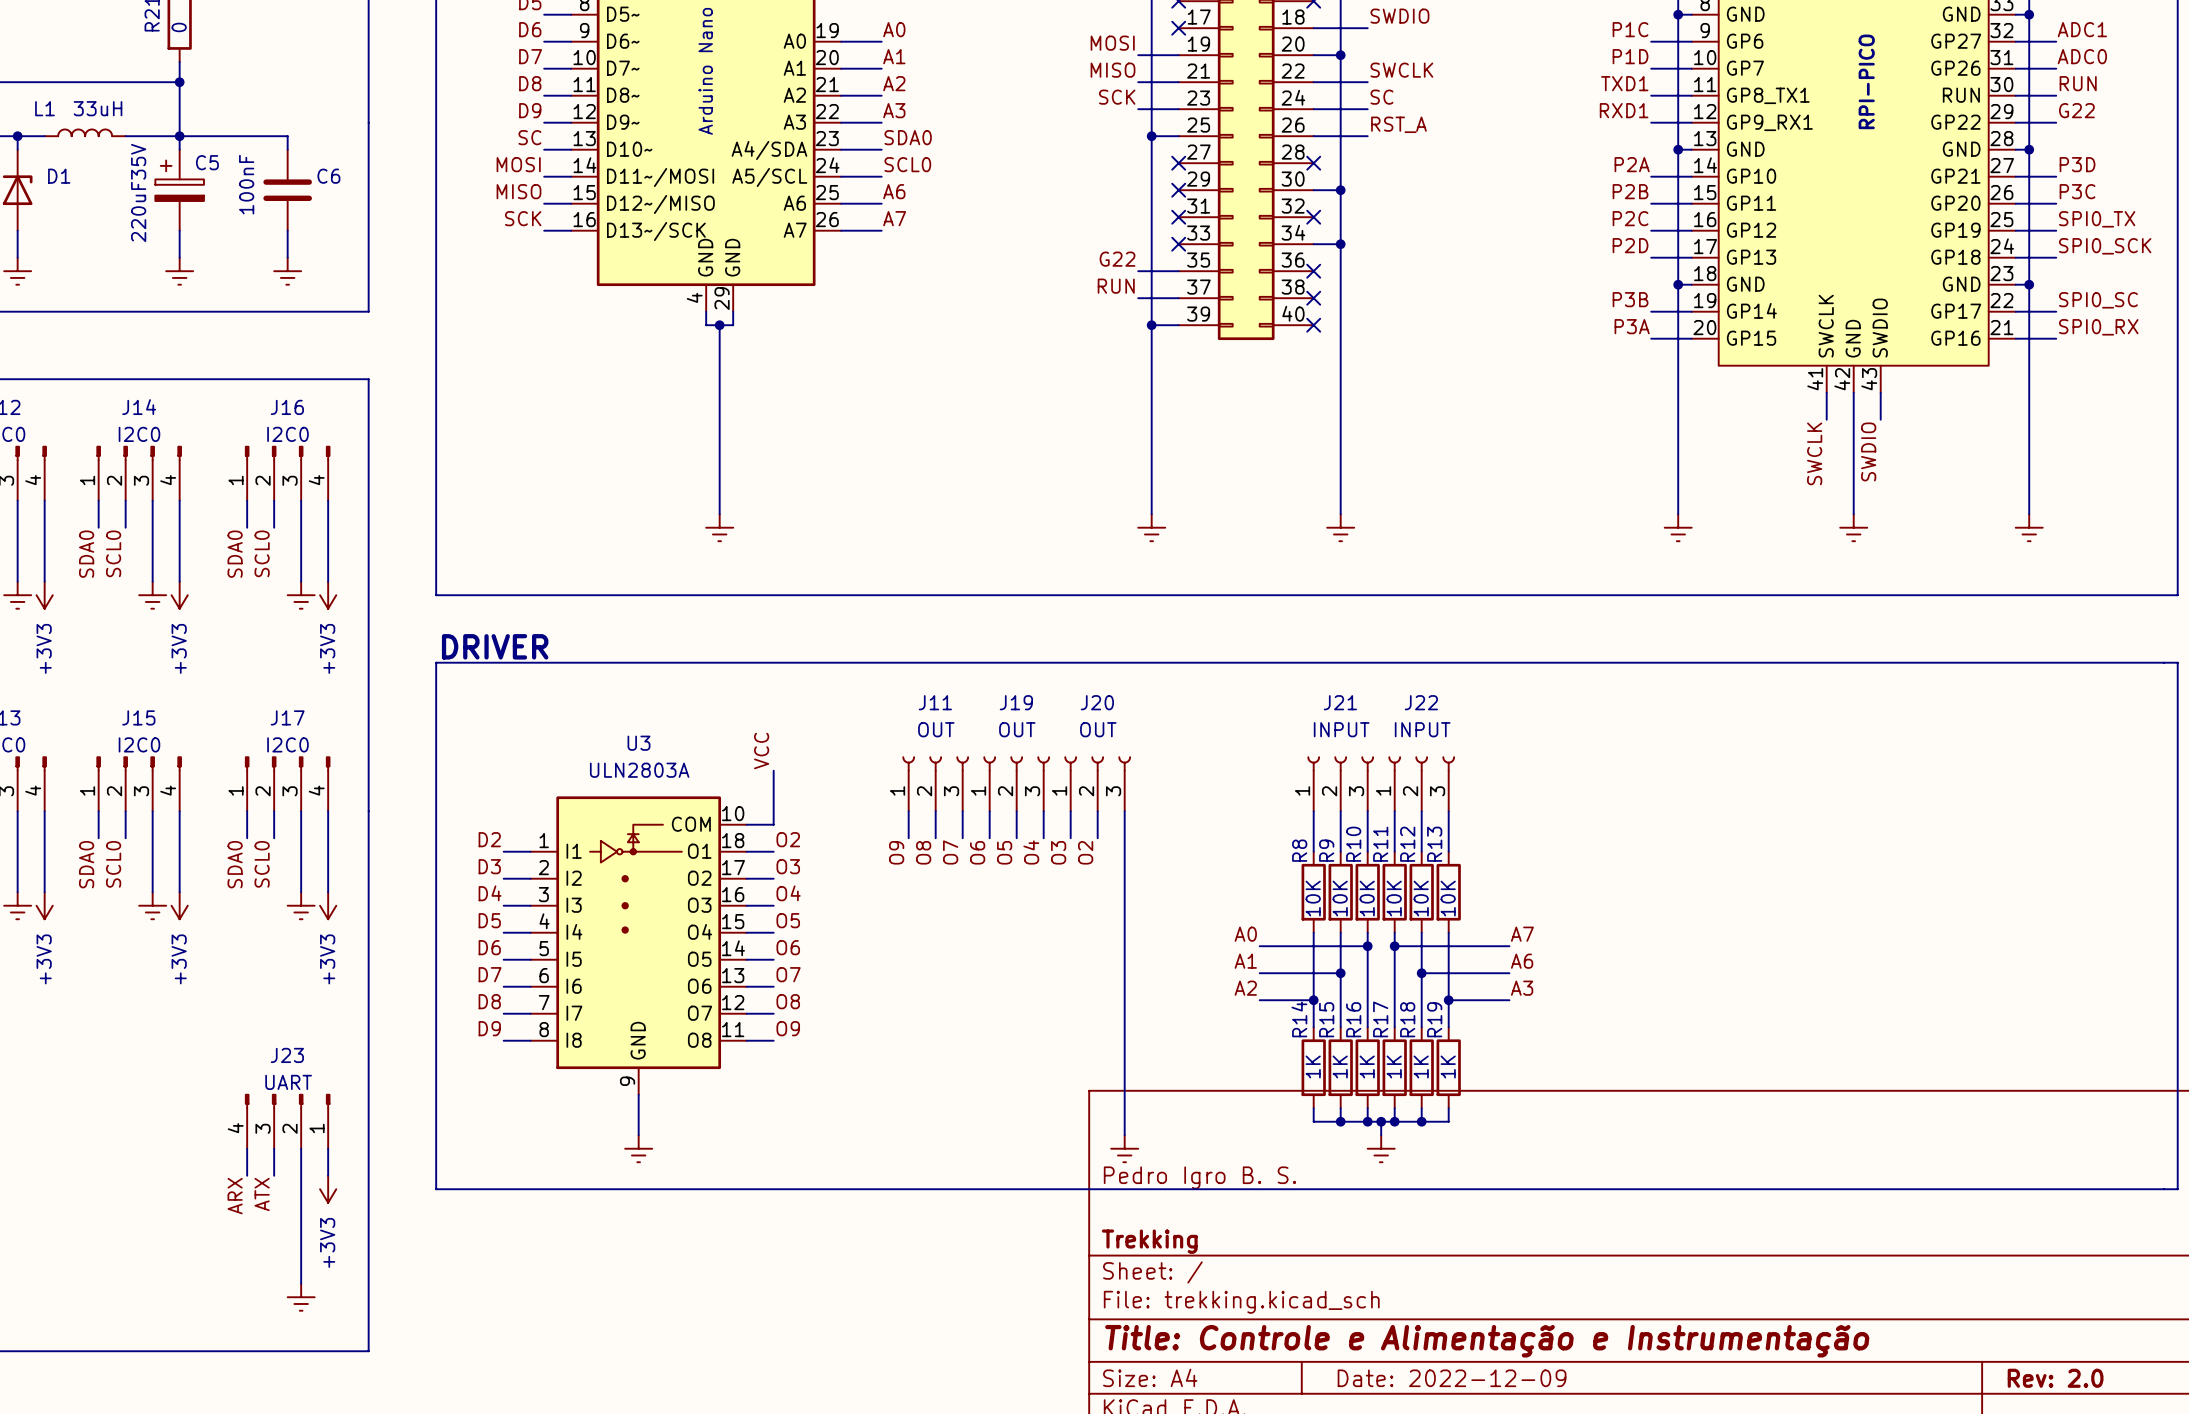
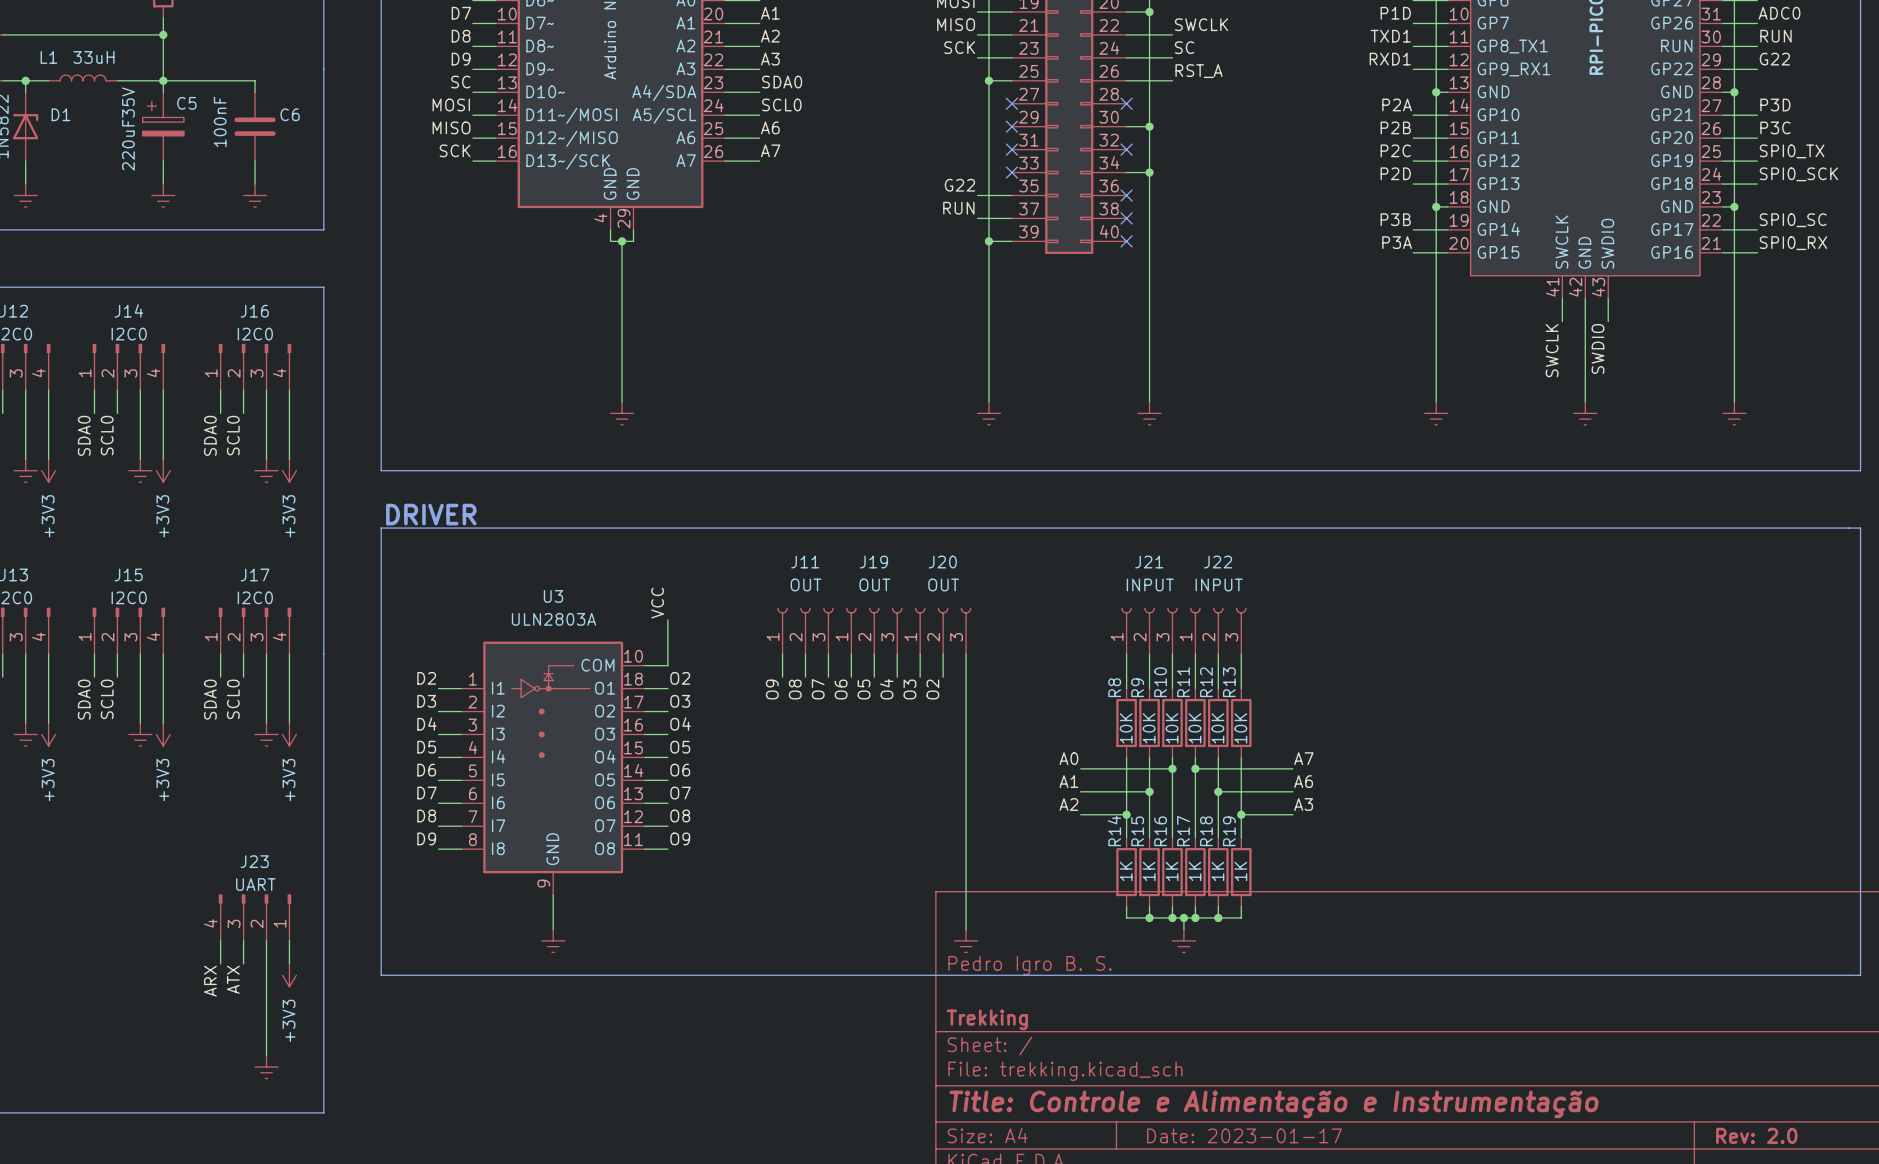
title block: Date: 2022-12-09 (1452, 1378) -> Date: 2023-01-17 (1244, 1135)

